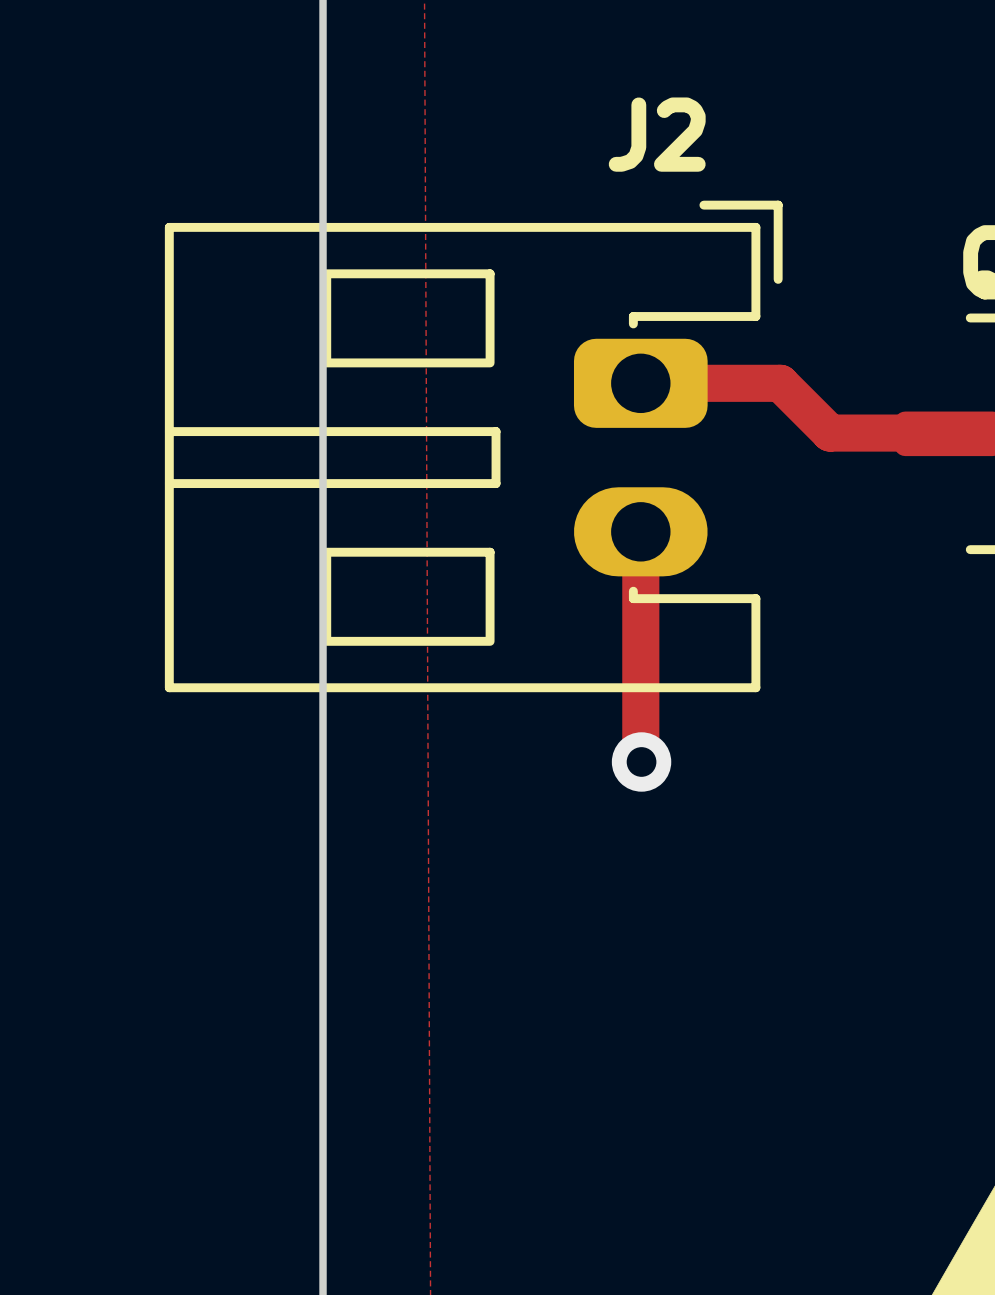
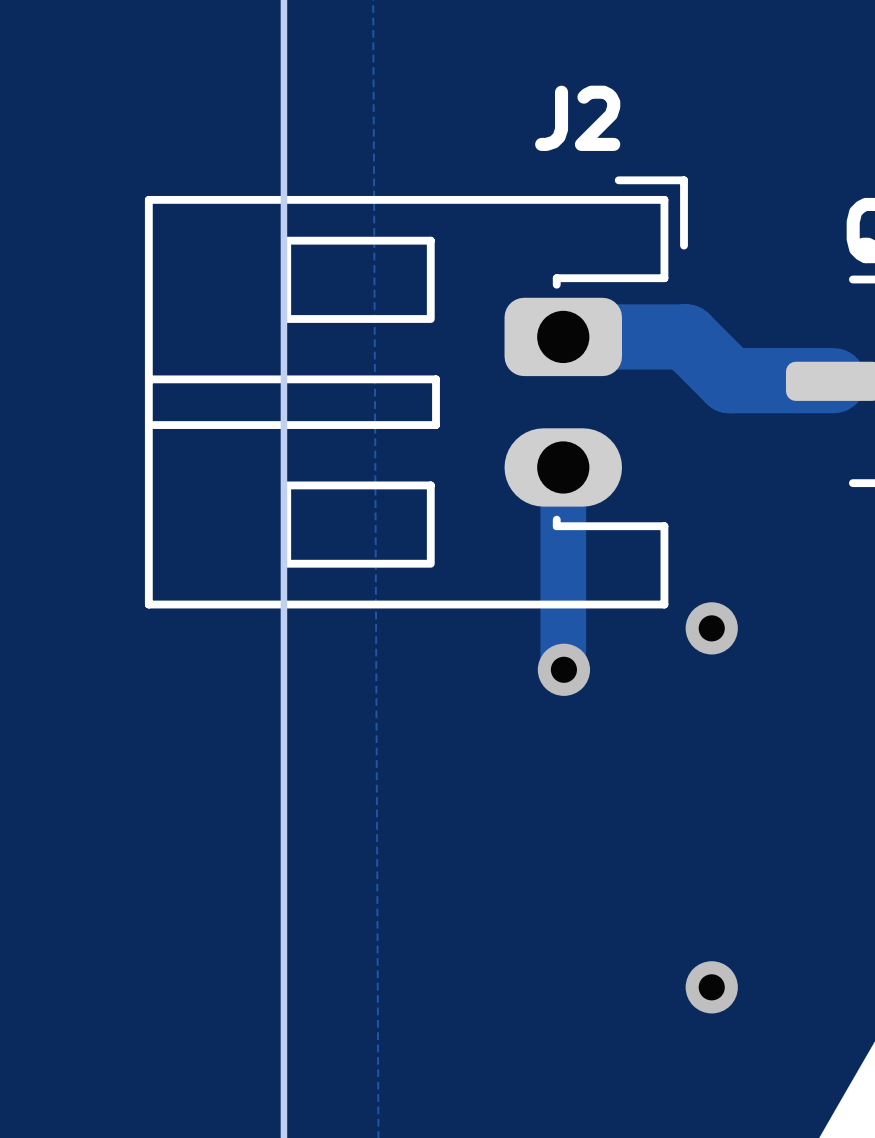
track width: thin (640, 383) (780, 383) (830, 433) (948, 433) -> thick (563, 336) (685, 336) (729, 380) (833, 380)
track width: thin (640, 531) (640, 761) -> thick (563, 467) (563, 669)
via: none -> (711, 628)
via: none -> (711, 987)

